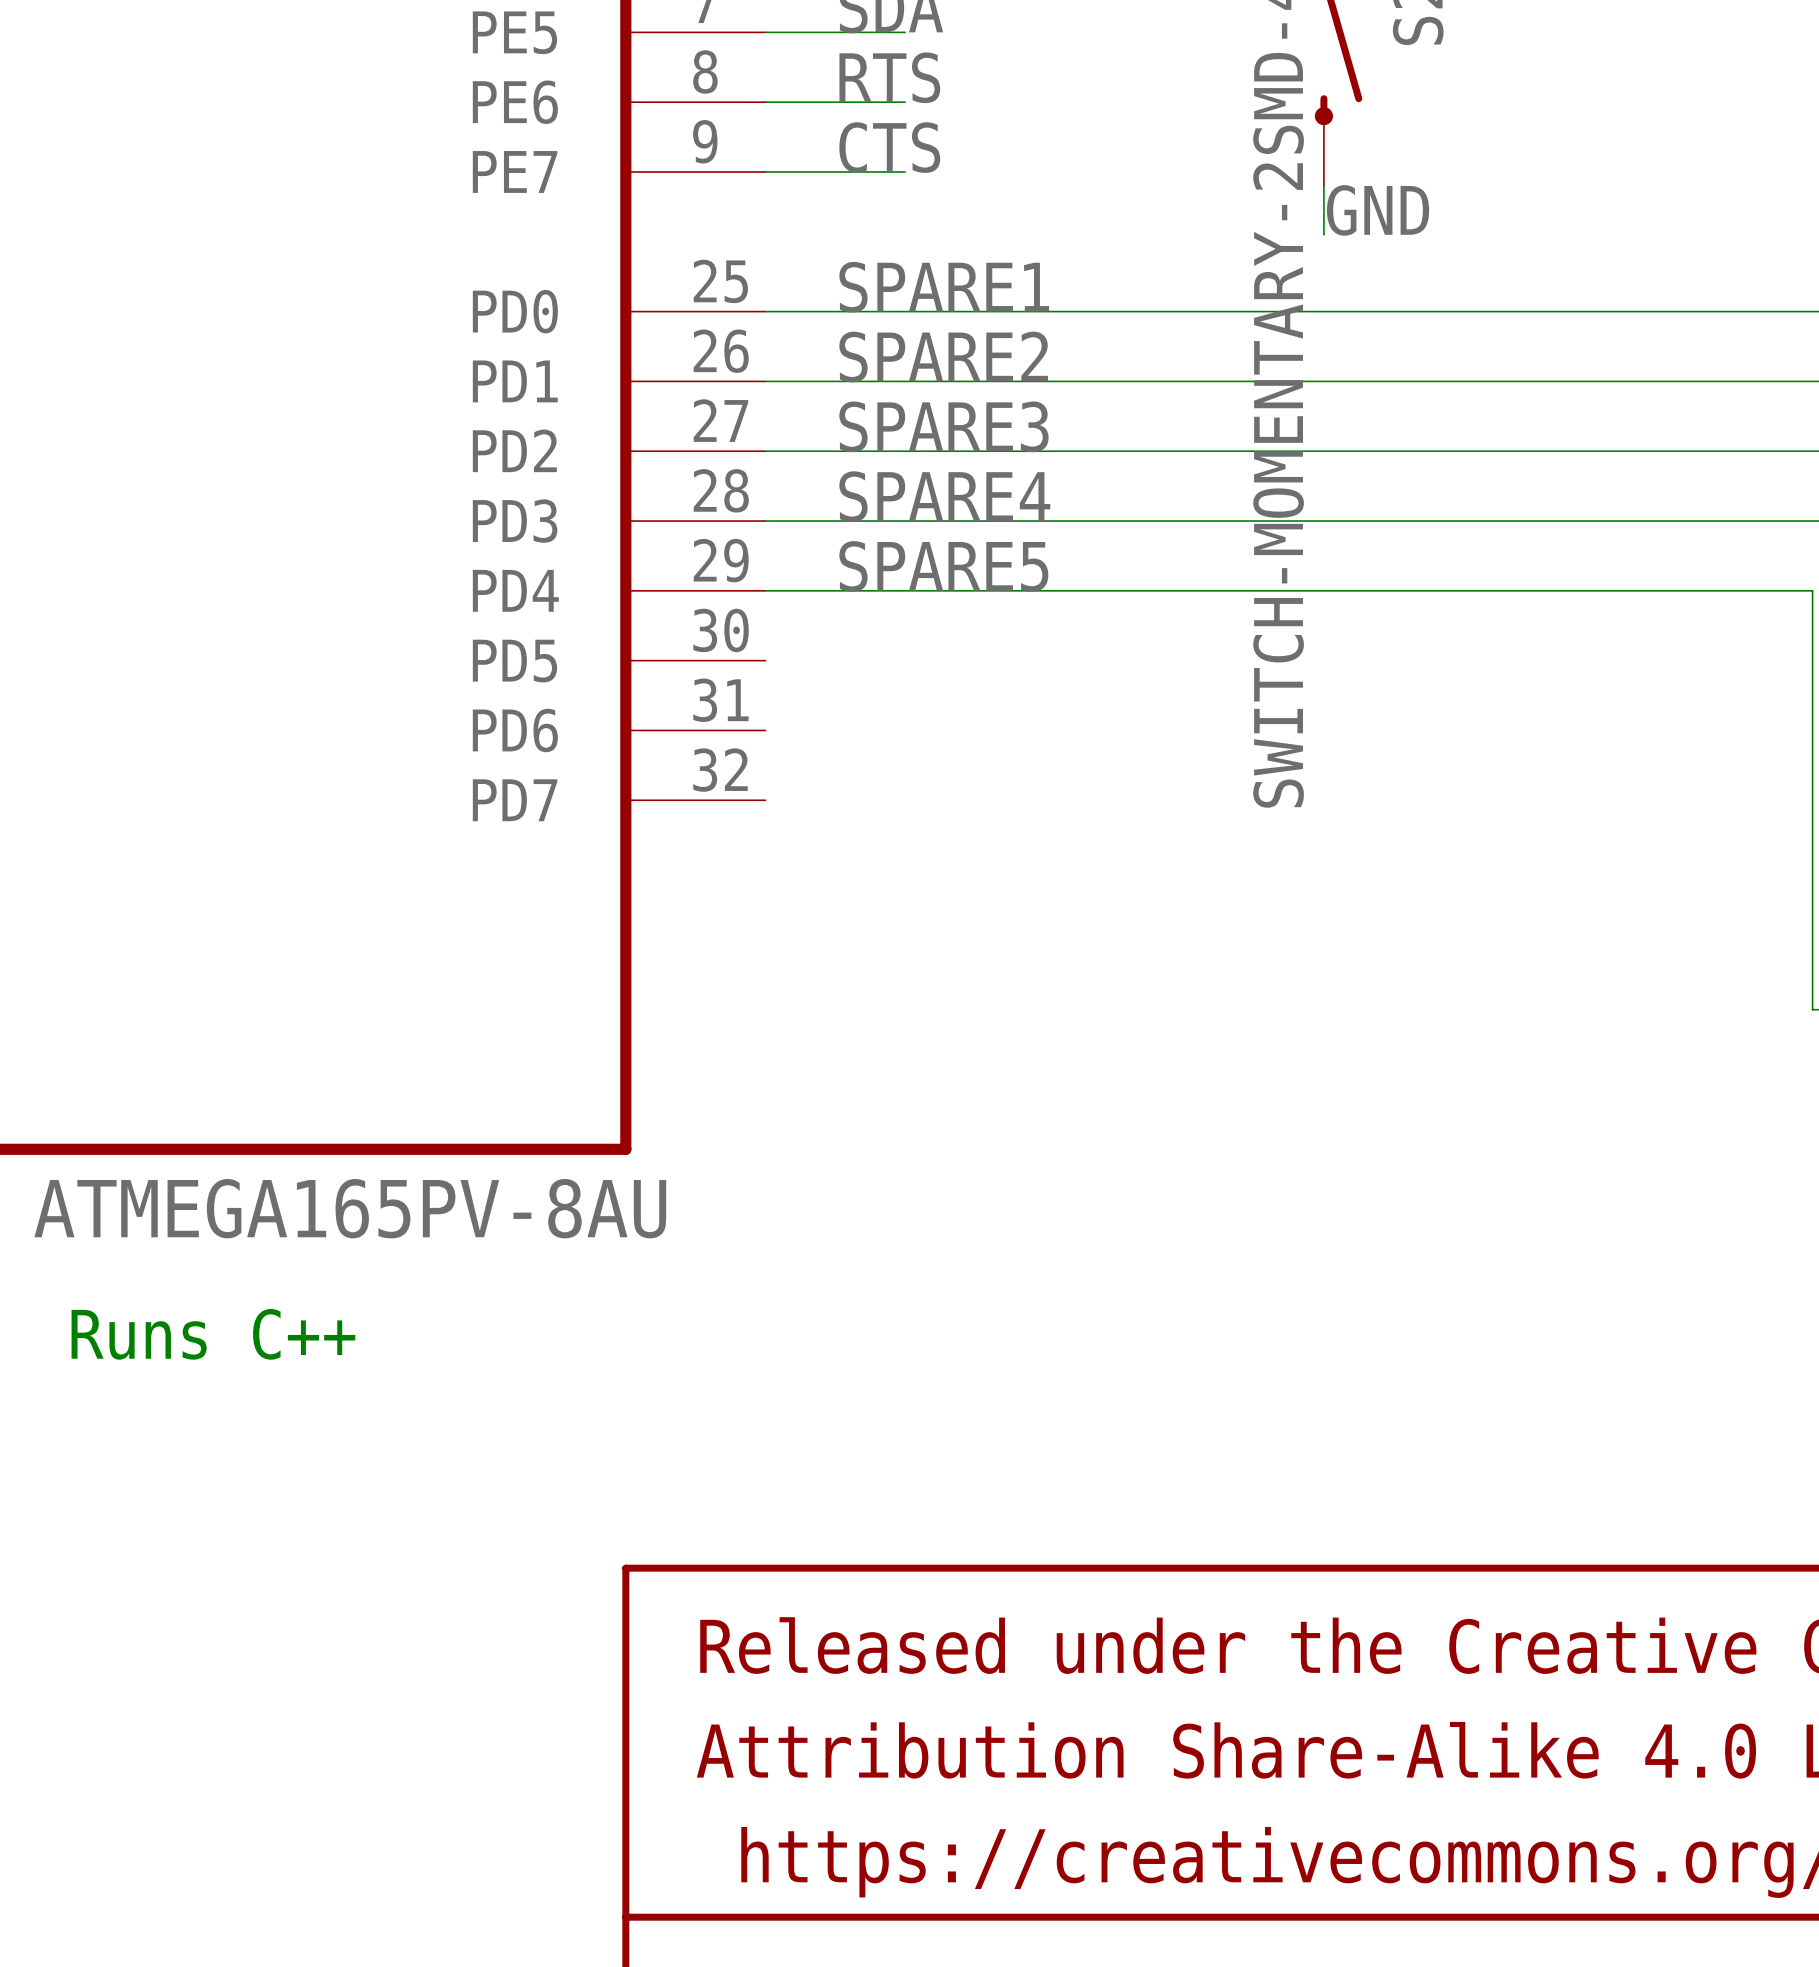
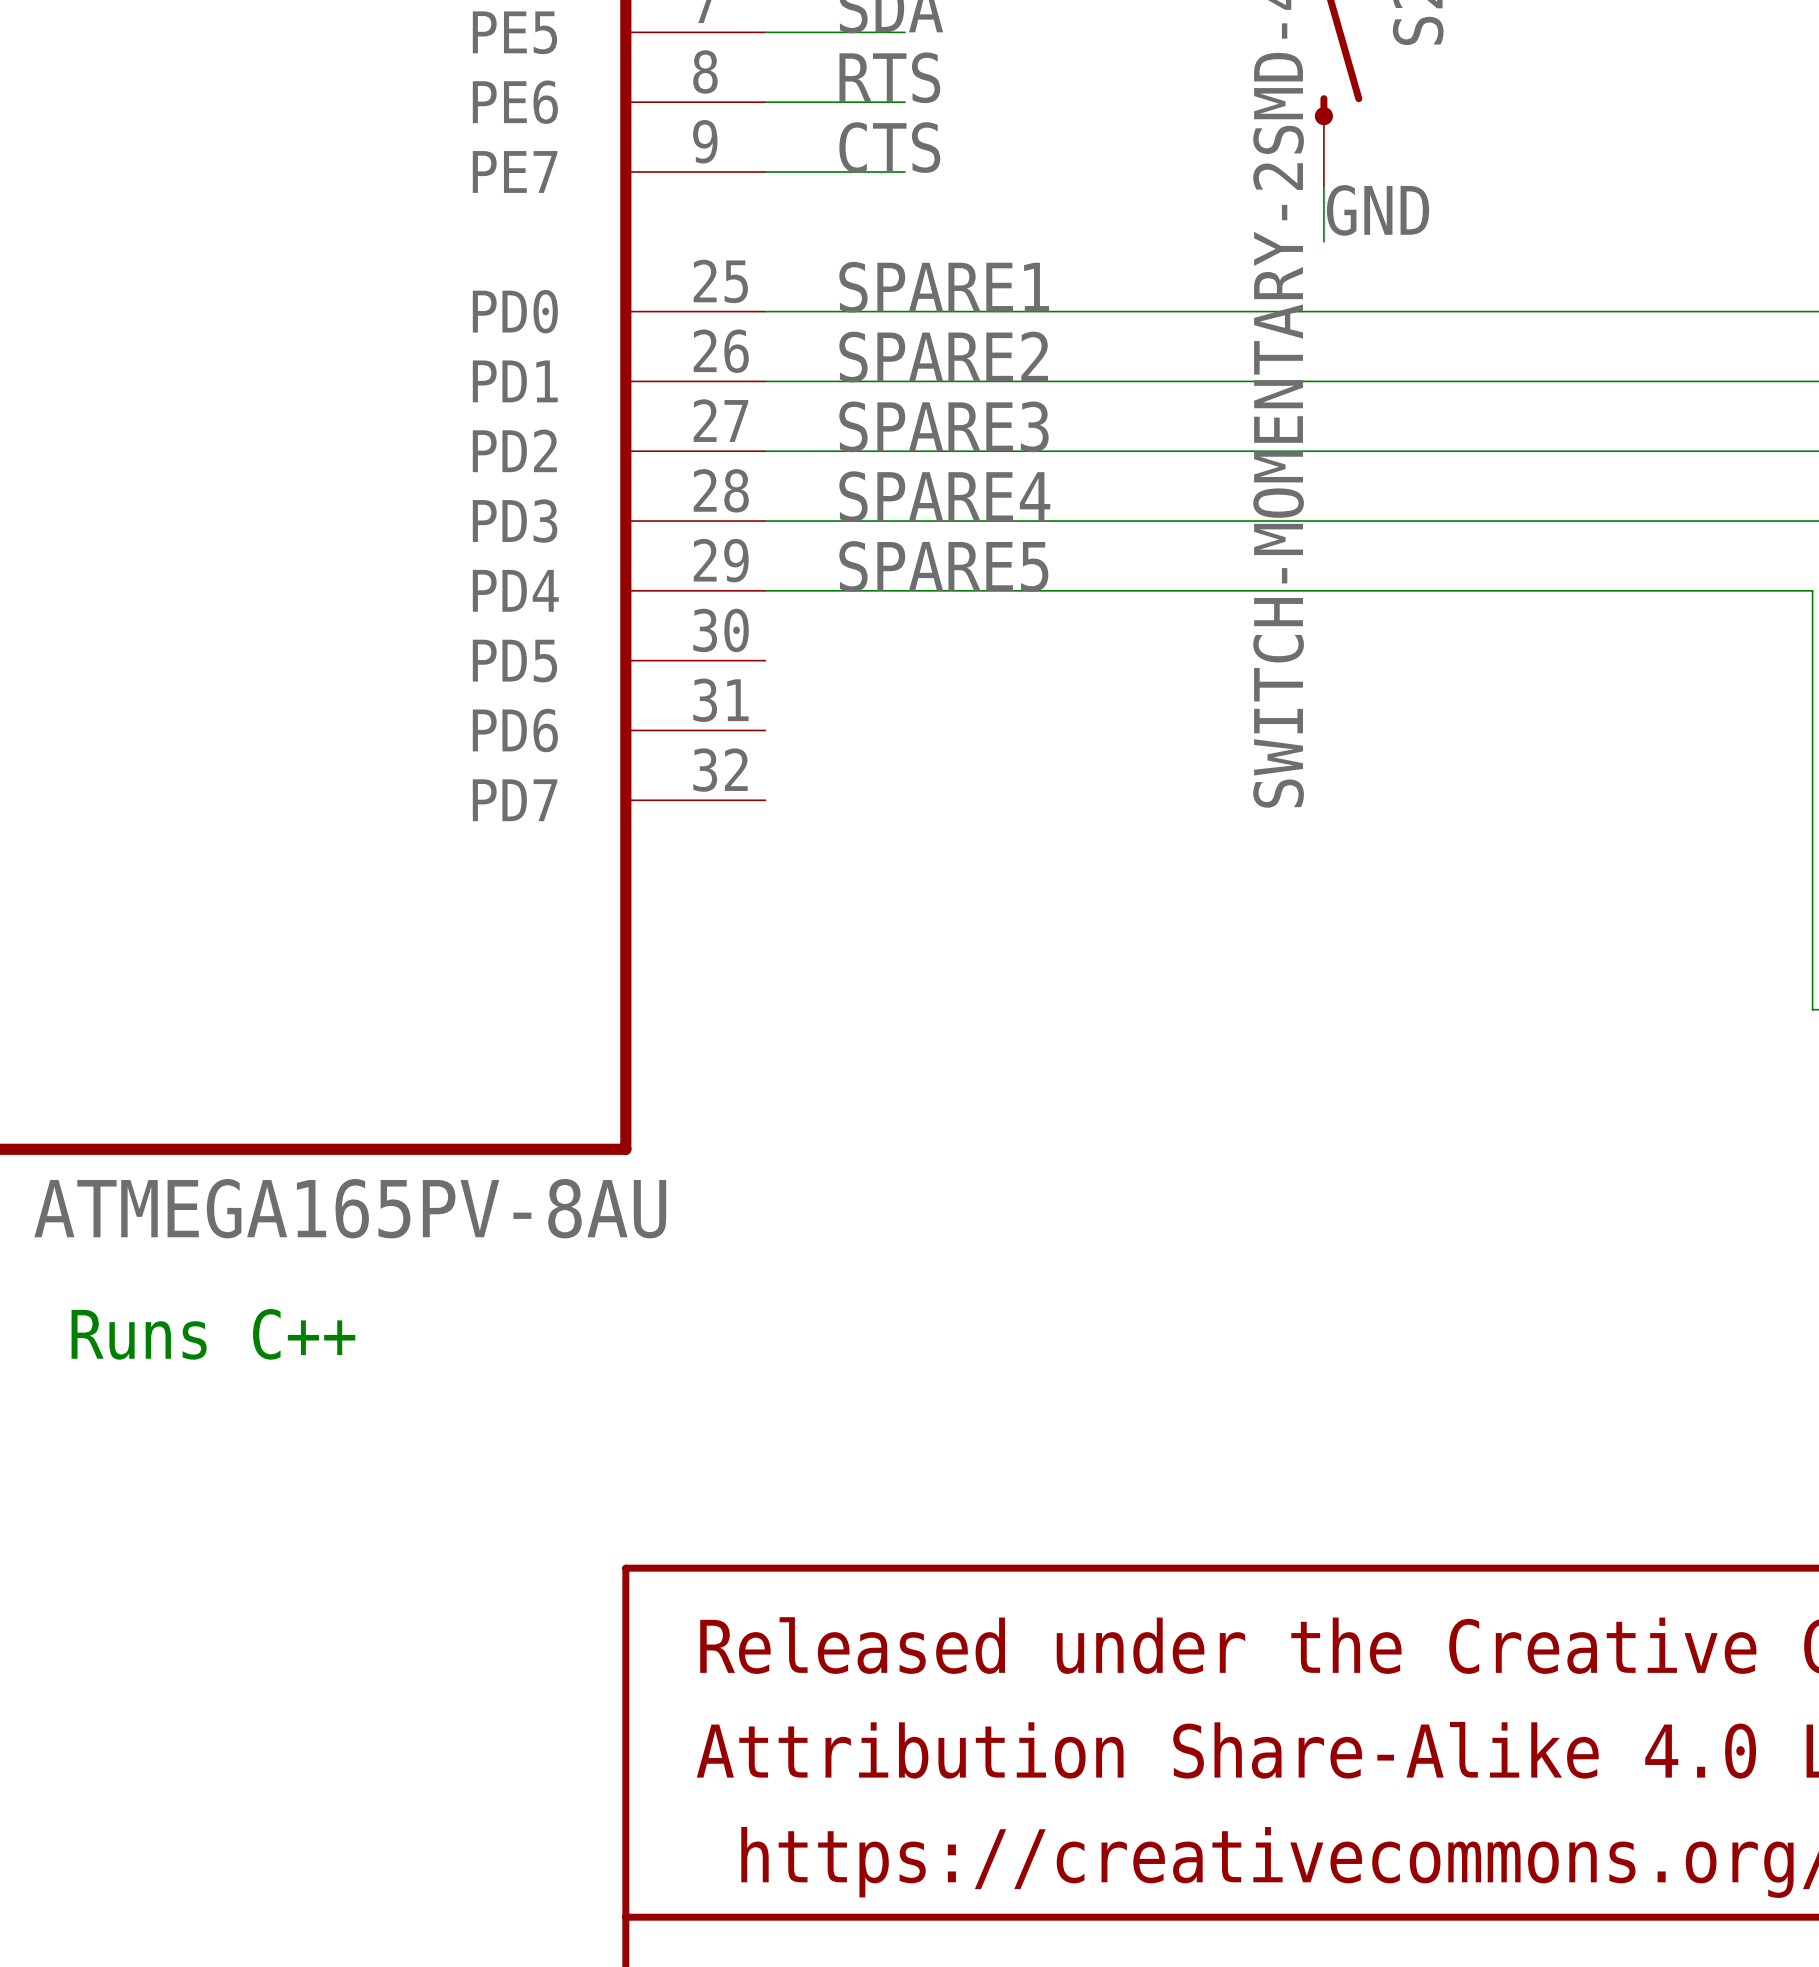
wire: none -> (1323, 234) (1323, 241)

